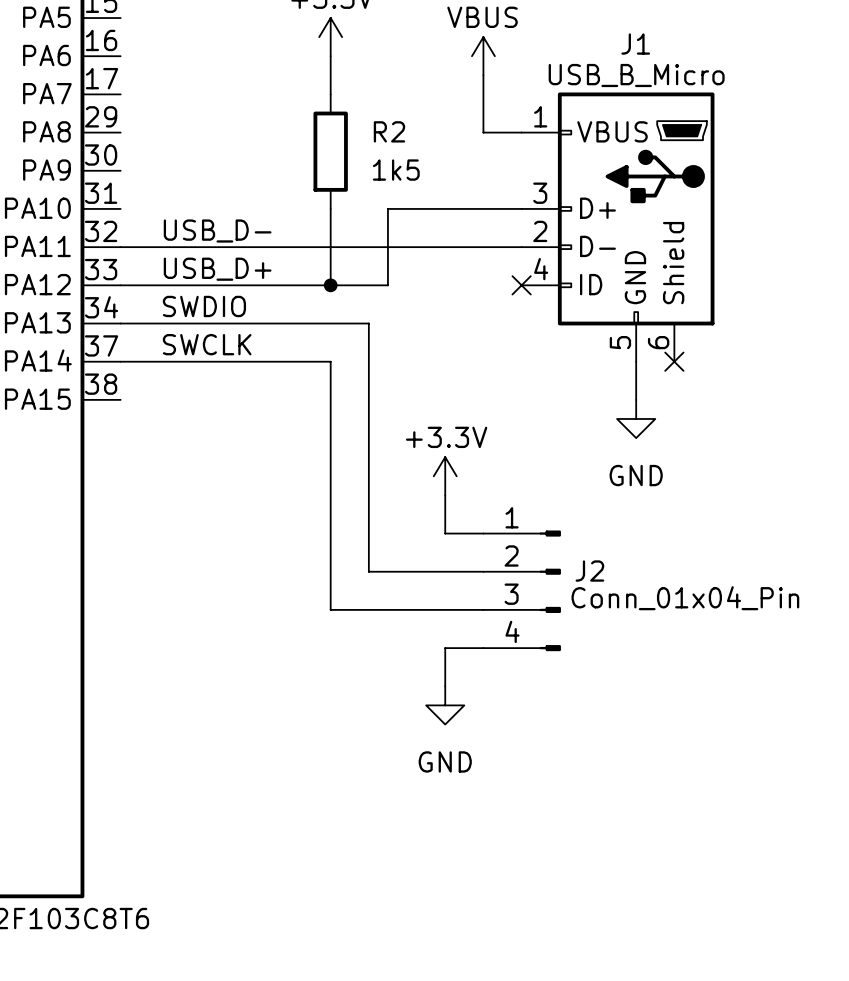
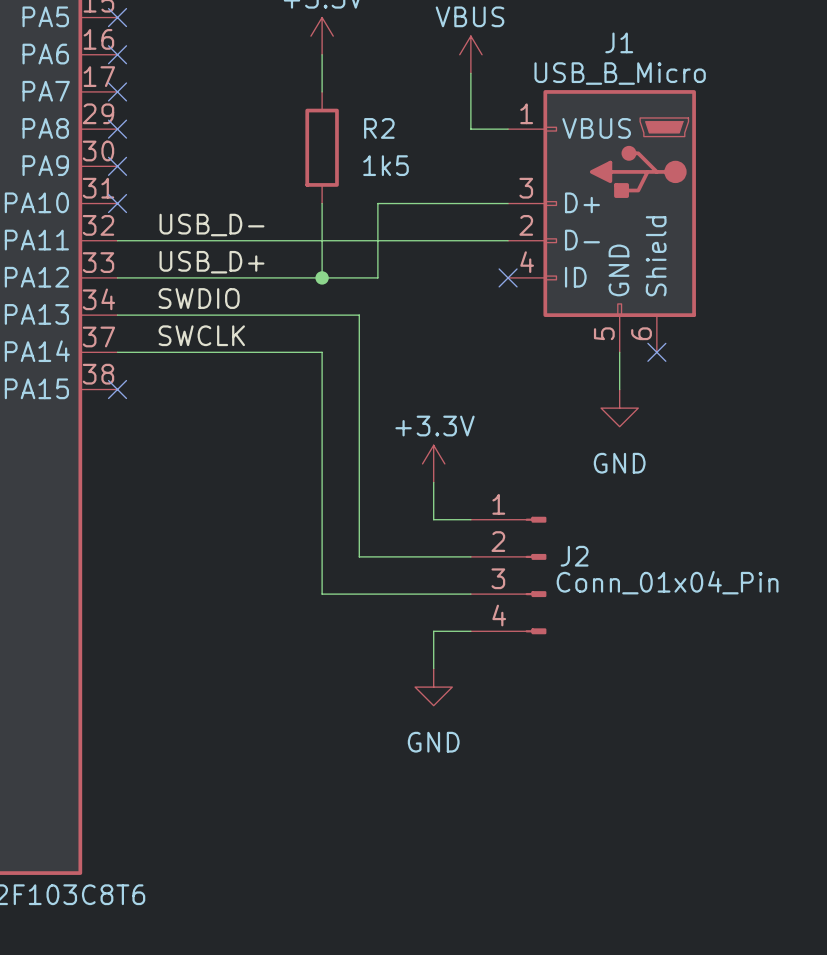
no-connect mark: none -> (117, 17)
no-connect mark: none -> (117, 54)
no-connect mark: none -> (117, 91)
no-connect mark: none -> (117, 129)
no-connect mark: none -> (117, 166)
no-connect mark: none -> (117, 203)
no-connect mark: none -> (117, 389)

